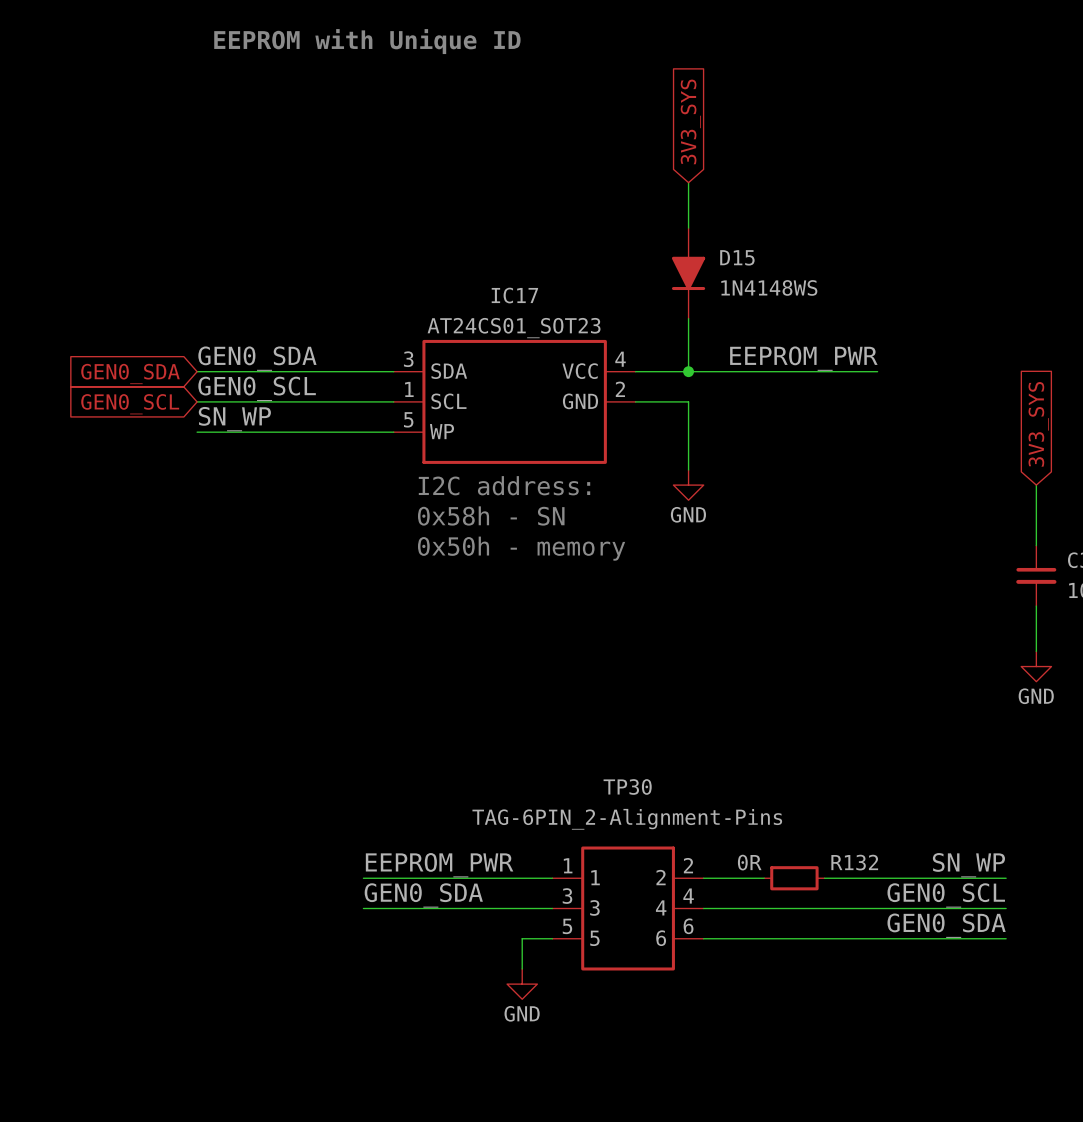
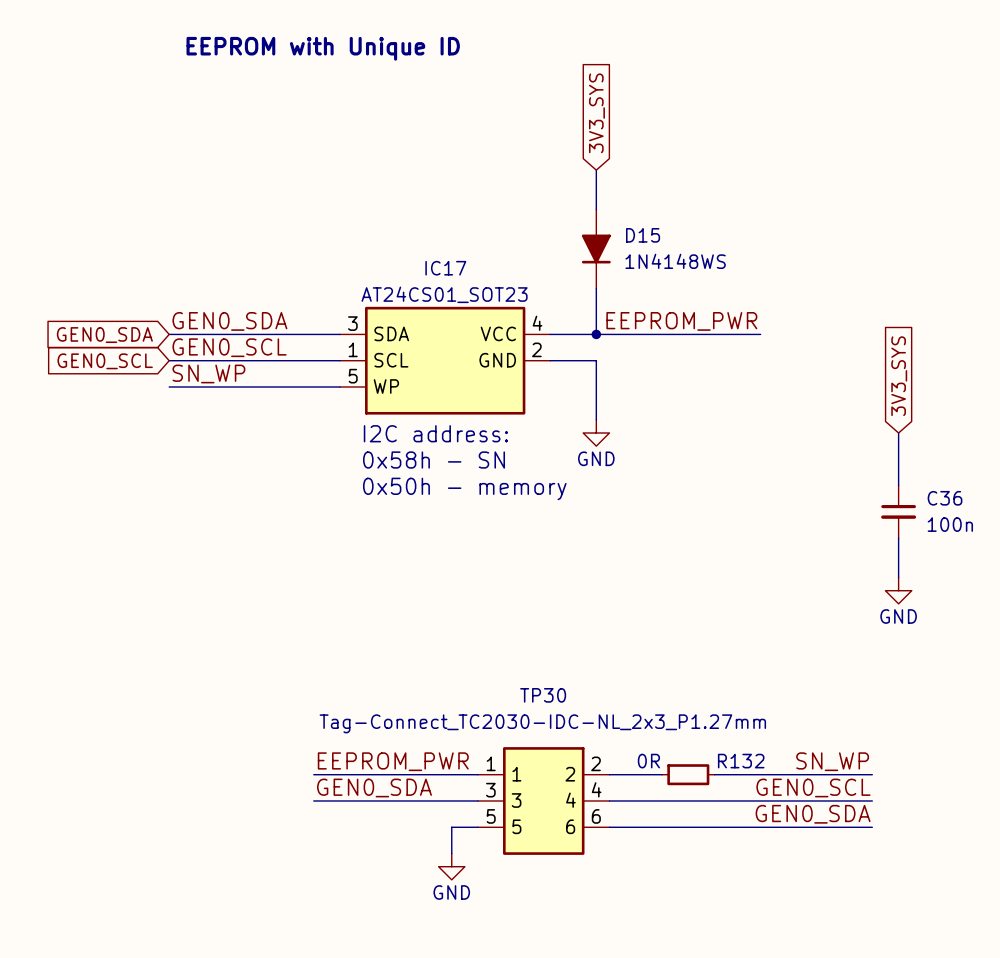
TP30 value: TAG-6PIN_2-Alignment-Pins (627, 819) -> Tag-Connect_TC2030-IDC-NL_2x3_P1.27mm (542, 723)

